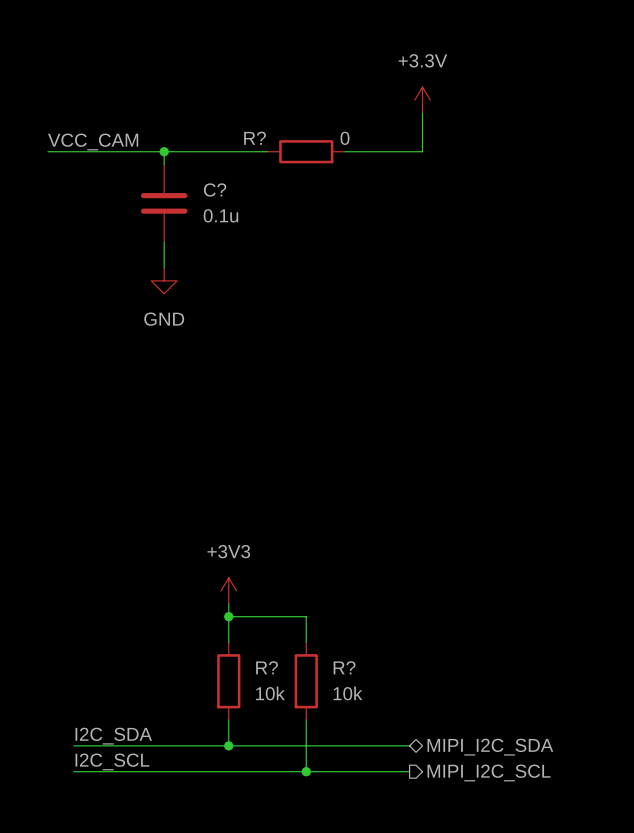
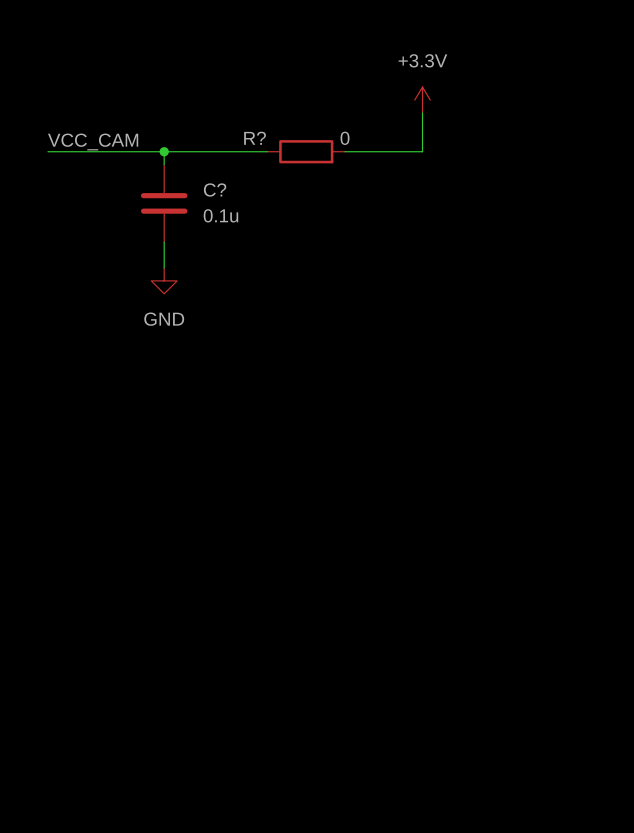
power symbol: +3V3 (228, 590) -> none
wire: (228, 603) (228, 642) -> none
wire: (228, 616) (306, 616) (306, 642) -> none
junction: (228, 616) -> none
R?: 10k (228, 681) -> none
R?: 10k (306, 681) -> none
wire: (228, 720) (228, 745) -> none
wire: (306, 720) (306, 771) -> none
label: I2C_SDA (113, 736) -> none
wire: (73, 745) (409, 745) -> none
junction: (228, 745) -> none
hierarchical label: MIPI_I2C_SDA (490, 747) -> none
label: I2C_SCL (112, 761) -> none
wire: (73, 771) (409, 771) -> none
junction: (306, 771) -> none
hierarchical label: MIPI_I2C_SCL (489, 772) -> none

